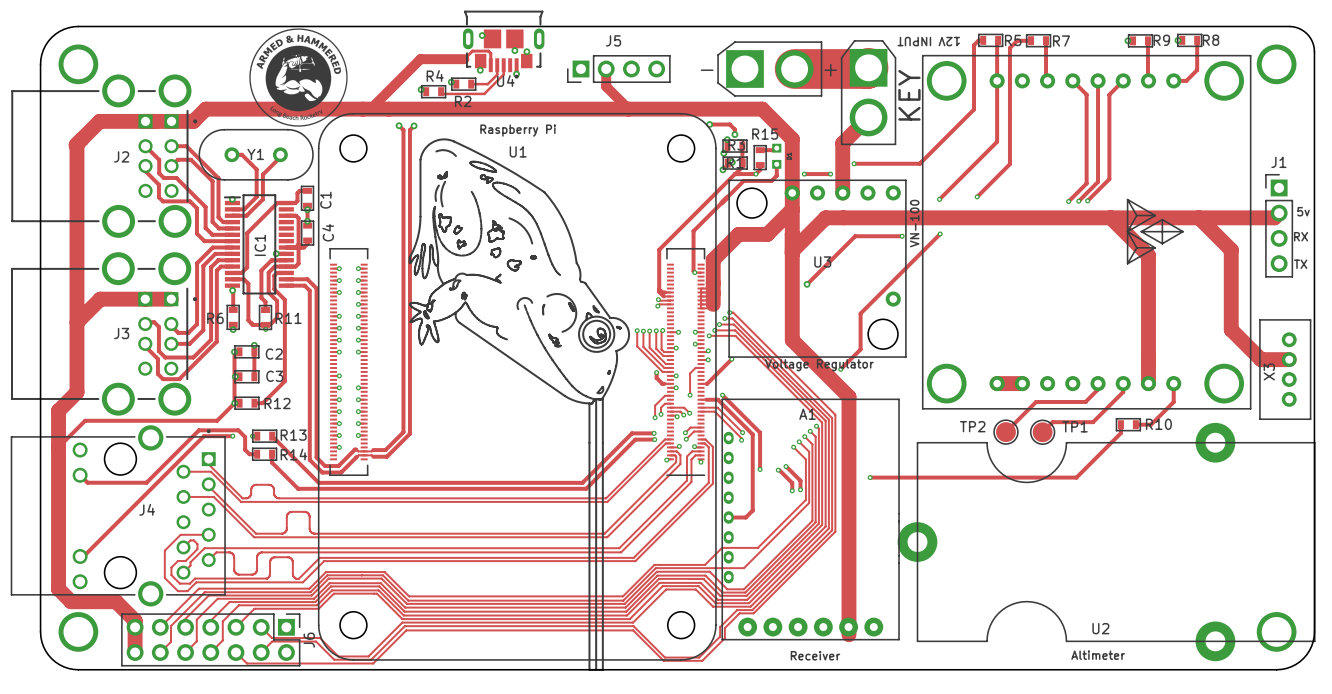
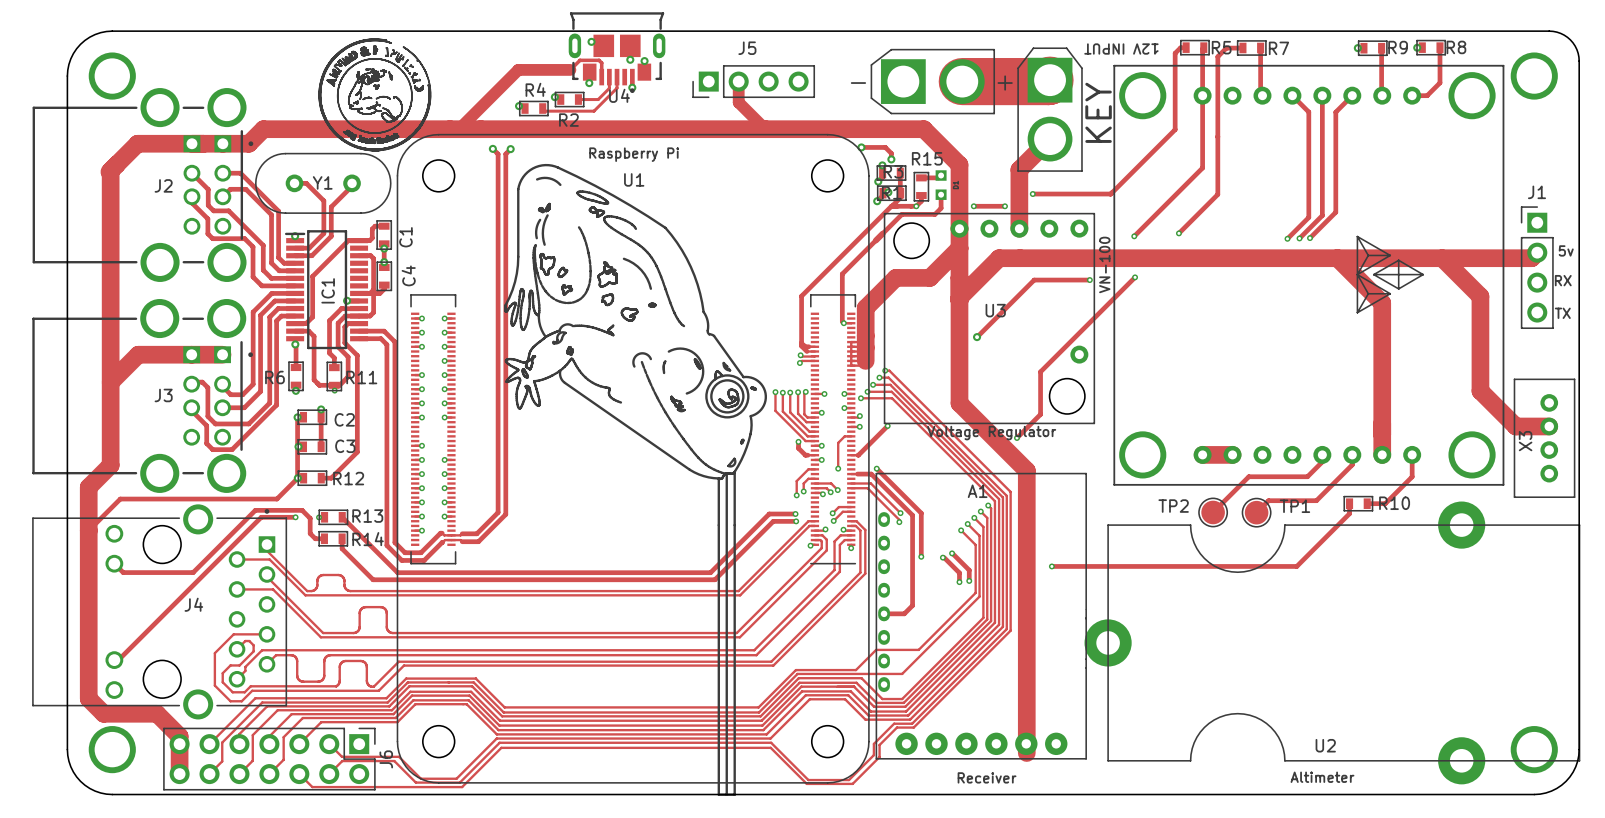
drawing: [249, 28, 348, 127] -> none
line: none -> (384, 40) (371, 39) (357, 41) (344, 47) (334, 56)
line: none -> (391, 43) (370, 40) (350, 46) (334, 58) (323, 76)
line: none -> (374, 46) (373, 53)
line: none -> (403, 47) (418, 60) (427, 77) (430, 96) (427, 114)
line: none -> (375, 47) (375, 48)
line: none -> (387, 48) (387, 56)
line: none -> (375, 51) (375, 53)
line: none -> (394, 51) (393, 54)
line: none -> (397, 52) (394, 54)
line: none -> (348, 53) (352, 60)
line: none -> (351, 54) (352, 57)
line: none -> (392, 53) (390, 56)
line: none -> (399, 53) (395, 59)
line: none -> (401, 54) (397, 60)
line: none -> (403, 56) (402, 59)
line: none -> (346, 56) (345, 57)
line: none -> (342, 58) (346, 64)
line: none -> (355, 58) (352, 60)
line: none -> (376, 58) (356, 63) (342, 78)
line: none -> (401, 58) (398, 61)
line: none -> (331, 59) (324, 70) (320, 82) (320, 107)
line: none -> (347, 59) (347, 59)
line: none -> (383, 59) (387, 61)
line: none -> (407, 59) (403, 65)
line: none -> (339, 60) (345, 65)
line: none -> (351, 61) (347, 63)
line: none -> (390, 62) (400, 68) (407, 78) (411, 90) (411, 104)
line: none -> (338, 62) (339, 64)
line: none -> (340, 63) (341, 65)
line: none -> (409, 66) (410, 66)
line: none -> (410, 64) (411, 65)
line: none -> (334, 66) (340, 71)
line: none -> (404, 67) (407, 70)
line: none -> (371, 69) (366, 69)
line: none -> (339, 71) (336, 72)
line: none -> (368, 73) (363, 74)
line: none -> (389, 72) (389, 74)
line: none -> (329, 74) (336, 77)
line: none -> (337, 73) (336, 74)
line: none -> (374, 75) (373, 77)
line: none -> (413, 74) (412, 78)
line: none -> (412, 78) (414, 83)
line: none -> (322, 79) (320, 90)
line: none -> (379, 79) (377, 80)
line: none -> (419, 79) (419, 80)
line: none -> (327, 80) (333, 85)
line: none -> (340, 81) (339, 85)
line: none -> (361, 80) (360, 81)
line: none -> (418, 80) (418, 80)
line: none -> (372, 81) (367, 84)
line: none -> (365, 83) (366, 84)
line: none -> (361, 84) (360, 89)
line: none -> (354, 86) (349, 95)
line: none -> (428, 86) (429, 97)
line: none -> (338, 87) (338, 100) (341, 112) (349, 122) (359, 129)
line: none -> (416, 90) (420, 90)
line: none -> (320, 92) (320, 101)
line: none -> (360, 93) (360, 98)
line: none -> (349, 96) (348, 102)
line: none -> (382, 96) (376, 98)
line: none -> (429, 99) (427, 109)
line: none -> (321, 104) (327, 120) (338, 134)
line: none -> (410, 106) (408, 110)
line: none -> (361, 108) (354, 109)
line: none -> (383, 108) (386, 109)
line: none -> (401, 110) (400, 115)
line: none -> (322, 113) (330, 128) (343, 140) (358, 148) (376, 150)
line: none -> (371, 113) (365, 114)
line: none -> (386, 113) (391, 118)
line: none -> (426, 113) (418, 127)
line: none -> (407, 113) (393, 128) (373, 133)
line: none -> (392, 116) (396, 118)
line: none -> (383, 118) (387, 121)
line: none -> (425, 117) (420, 126)
line: none -> (418, 129) (400, 144) (379, 150)
line: none -> (362, 130) (366, 132)
line: none -> (415, 131) (410, 135)
line: none -> (387, 136) (388, 140)
line: none -> (408, 137) (404, 140)
line: none -> (343, 139) (366, 148) (390, 146)
line: none -> (377, 138) (377, 143)
line: none -> (374, 140) (374, 142)
line: none -> (400, 142) (397, 144)

